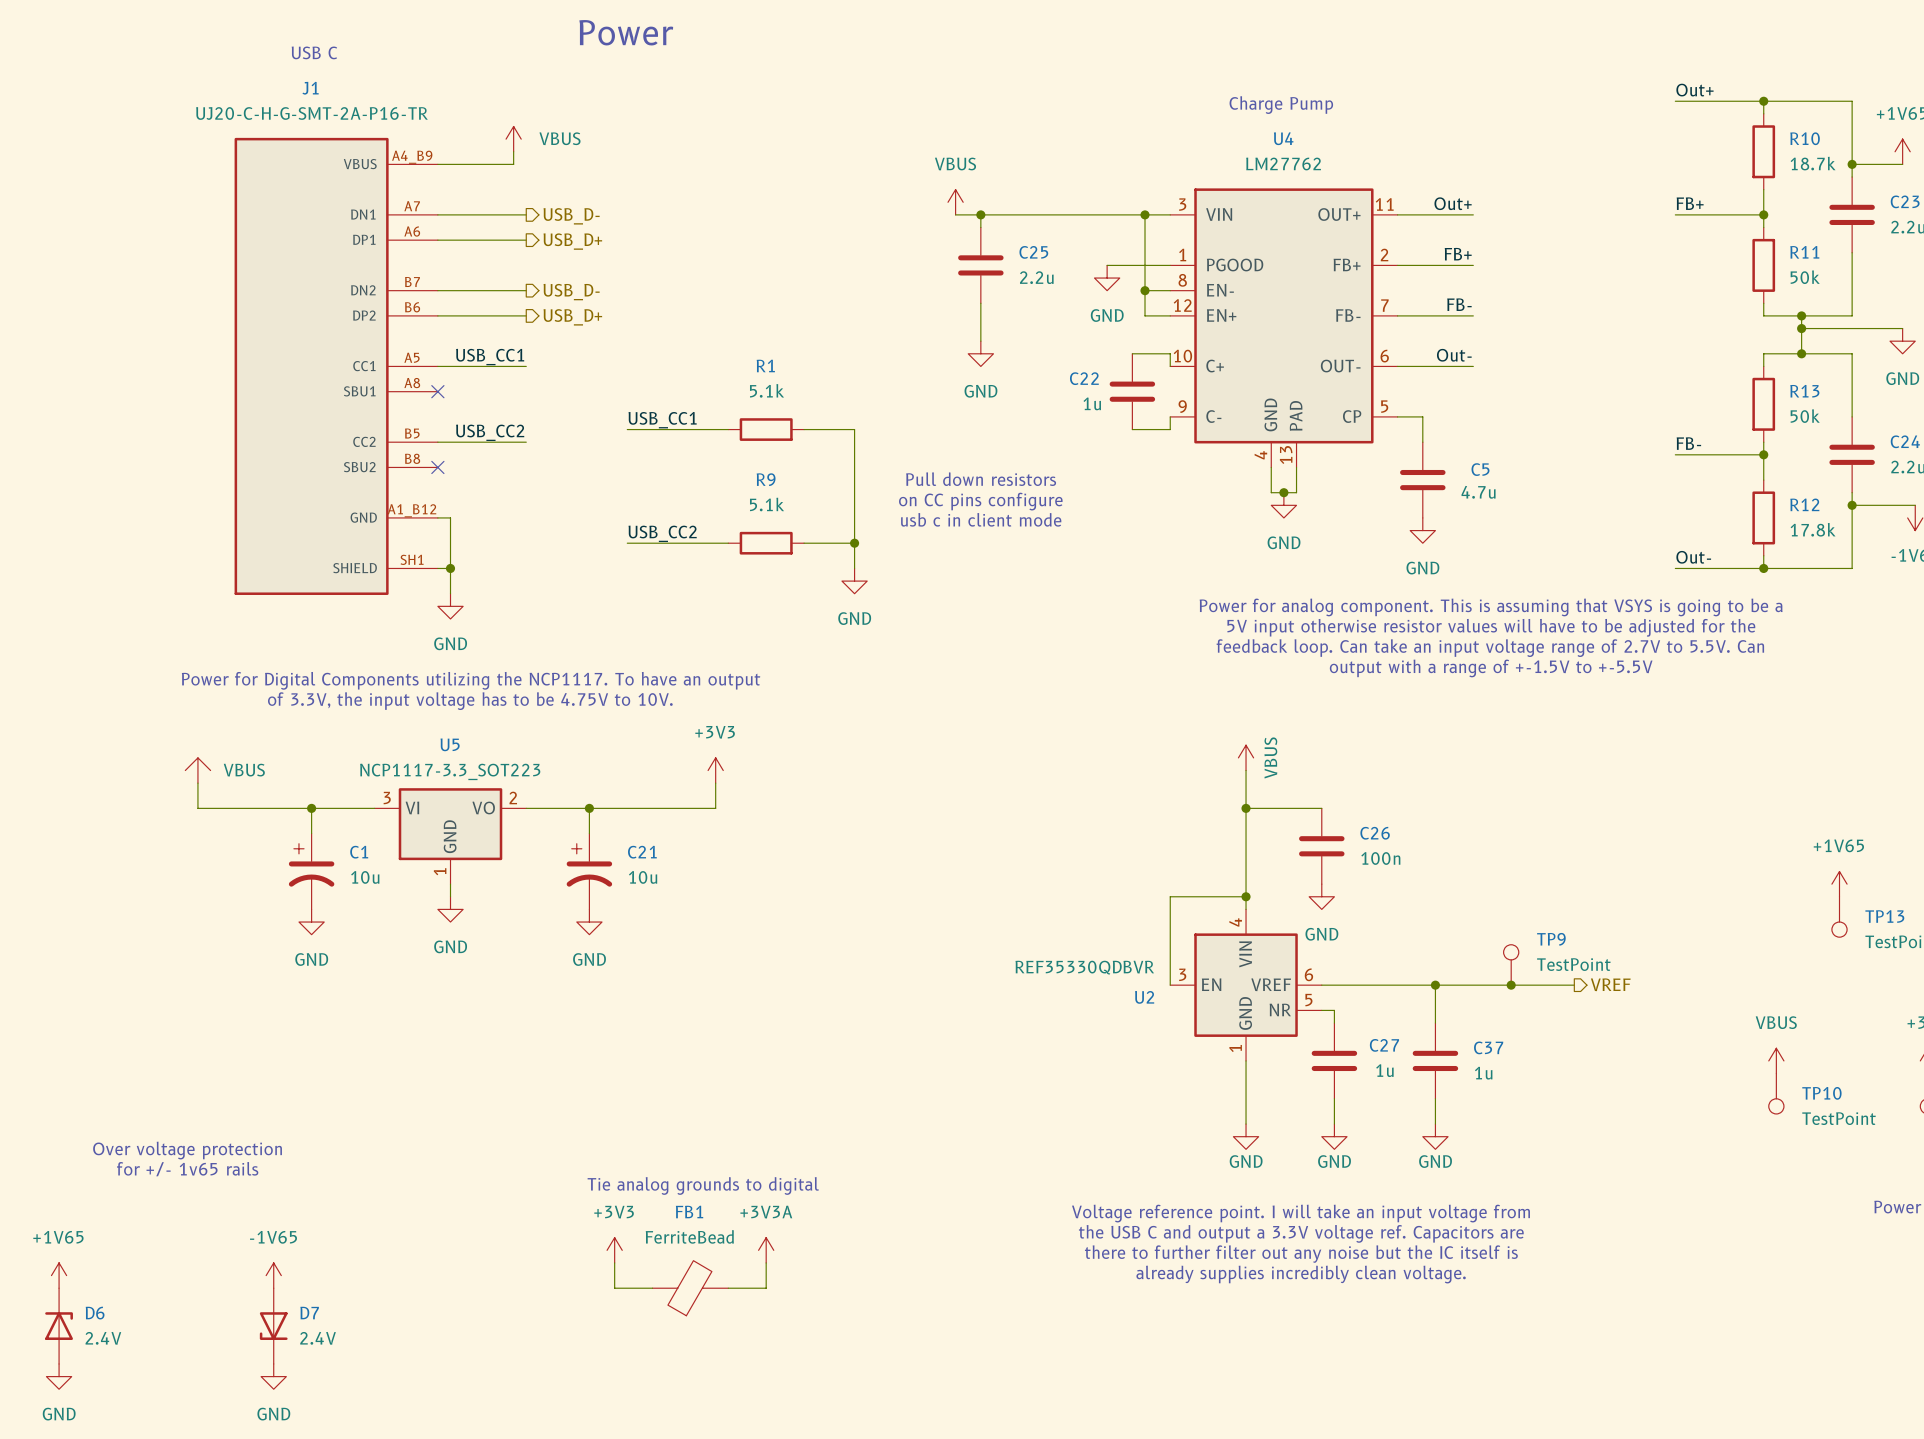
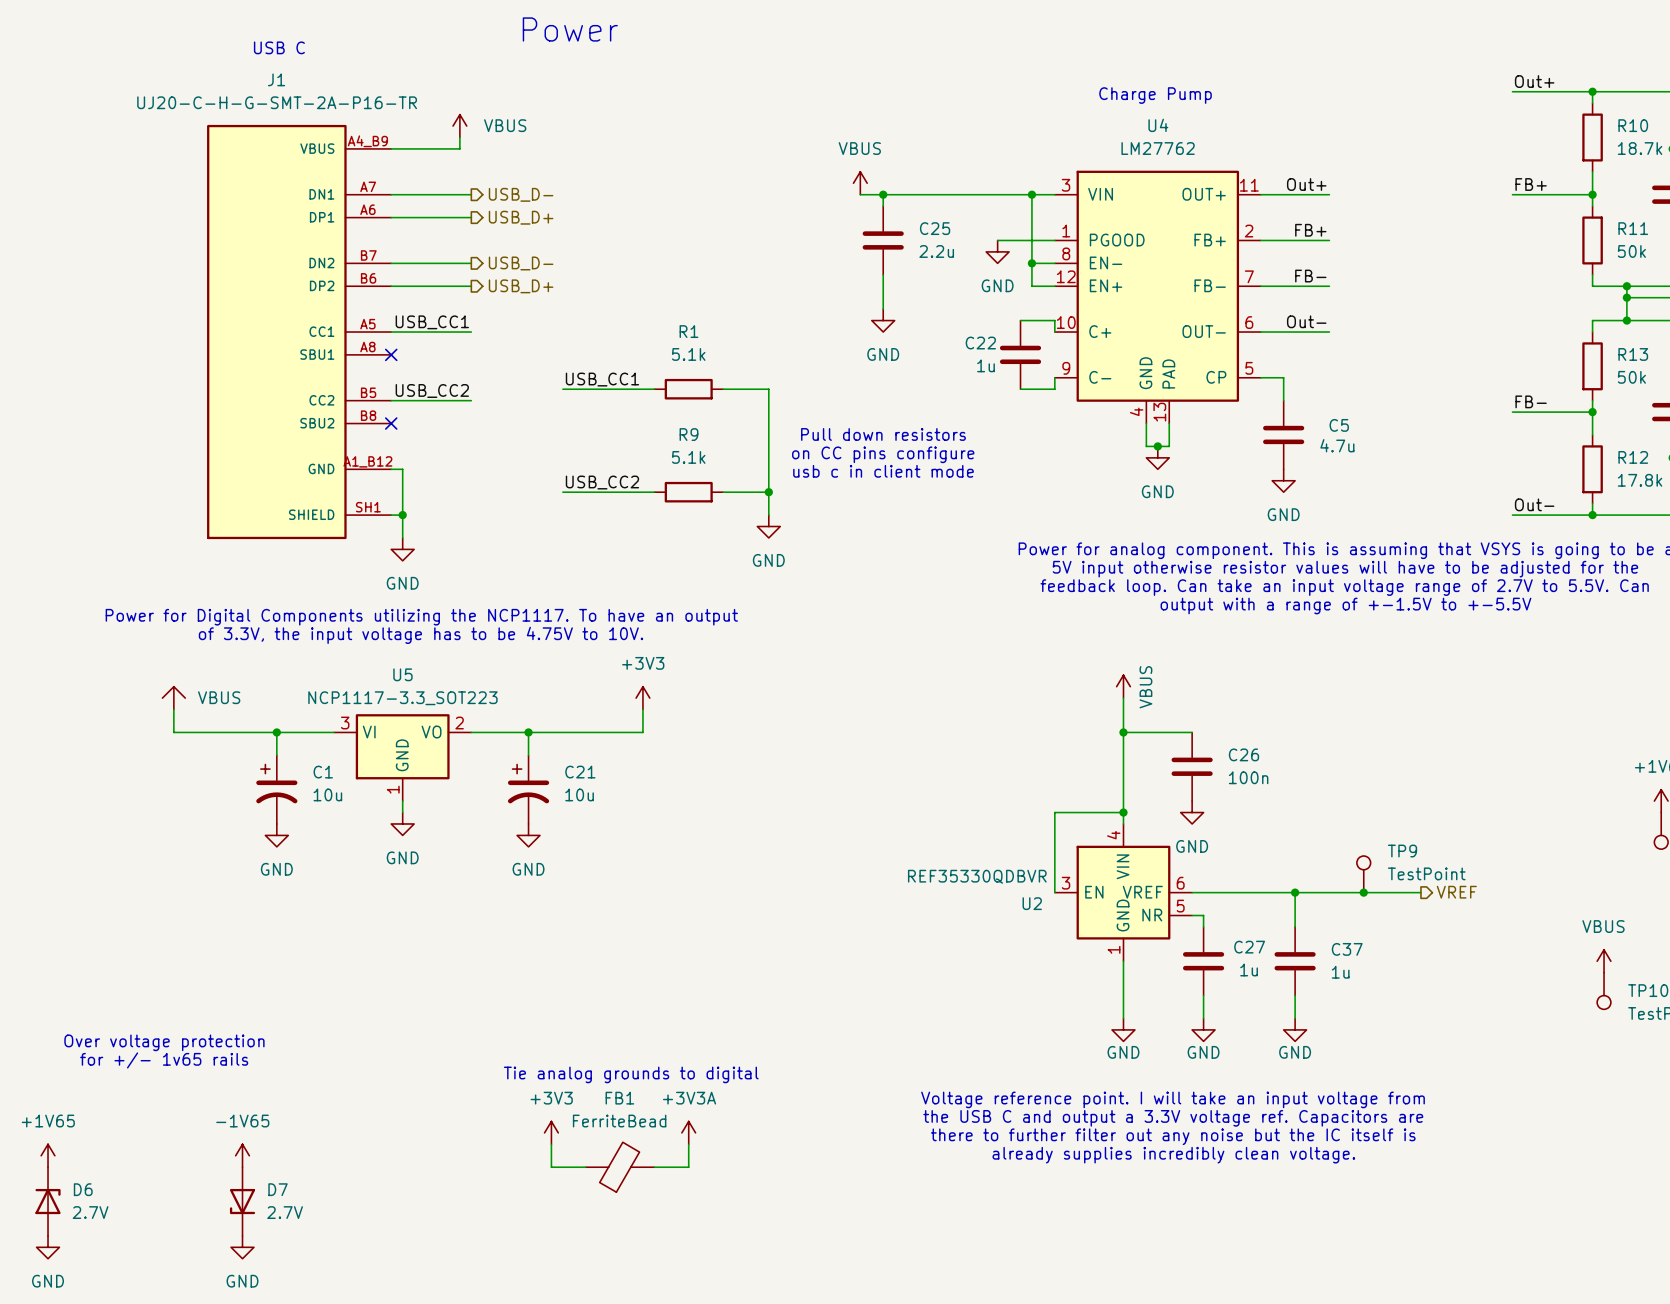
D6 value: 2.4V (103, 1338) -> 2.7V (90, 1212)
D7 value: 2.4V (318, 1338) -> 2.7V (285, 1212)

